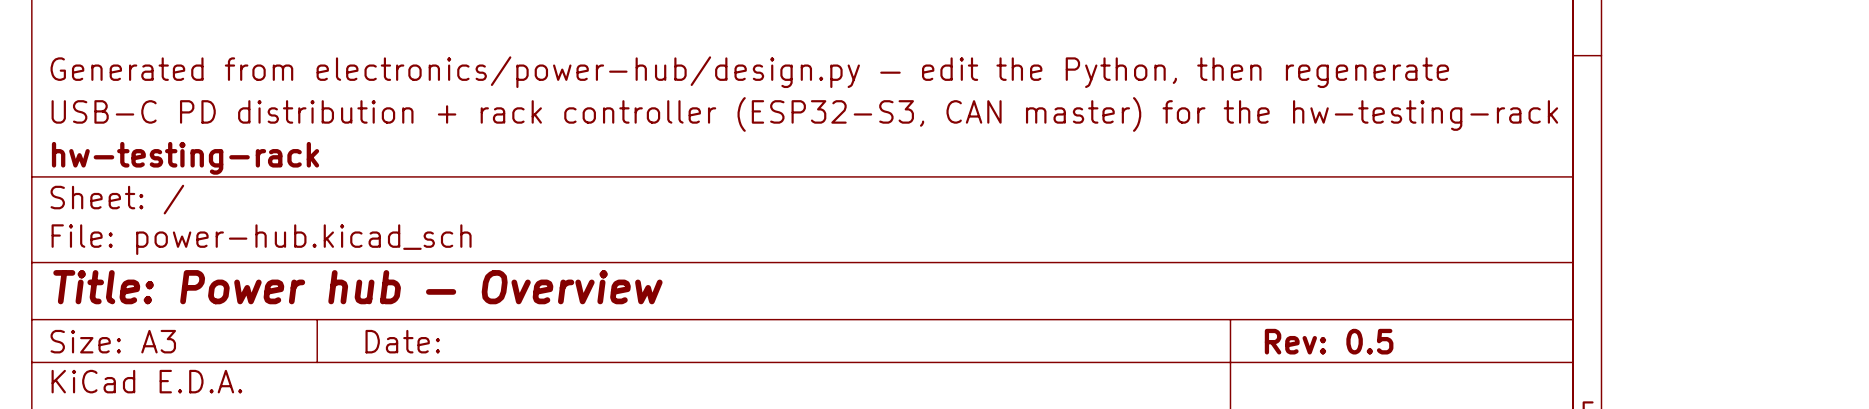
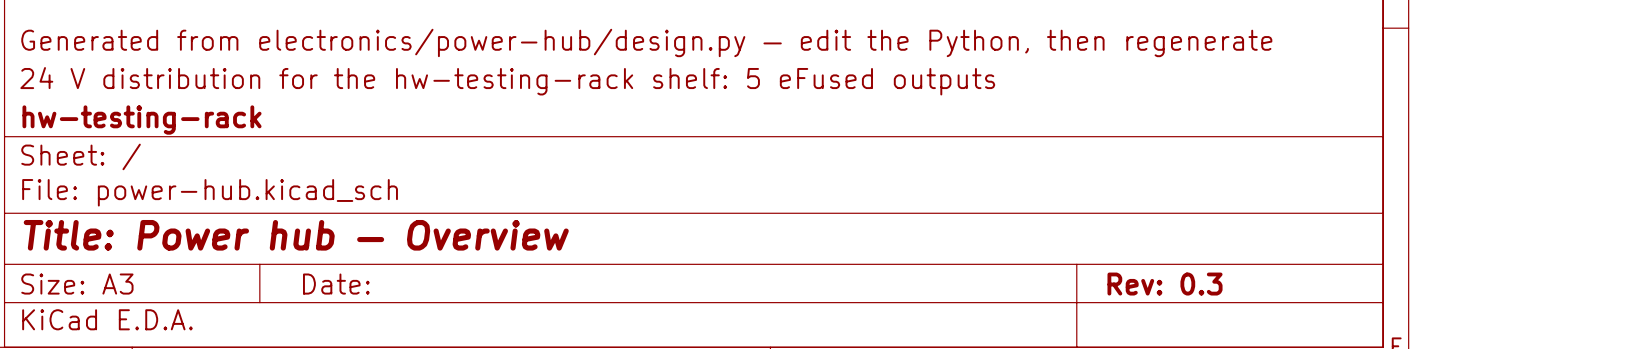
title block: USB-C PD distribution + rack controller (ESP32-S3, CAN master) for the hw-testing-rack (804, 114) -> 24 V distribution for the hw-testing-rack shelf: 5 eFused outputs (507, 81)
title block: Rev: 0.5 (1329, 341) -> Rev: 0.3 (1165, 284)

